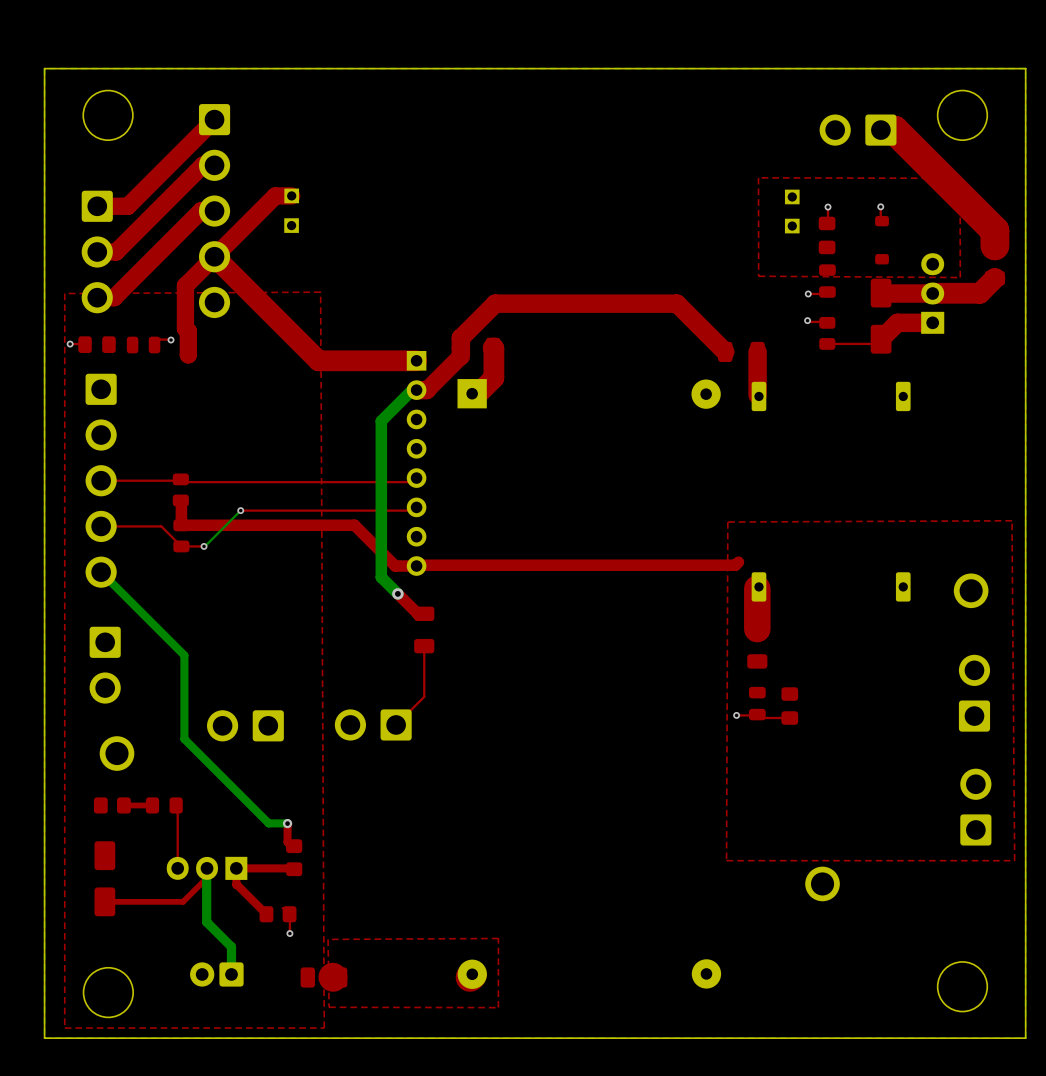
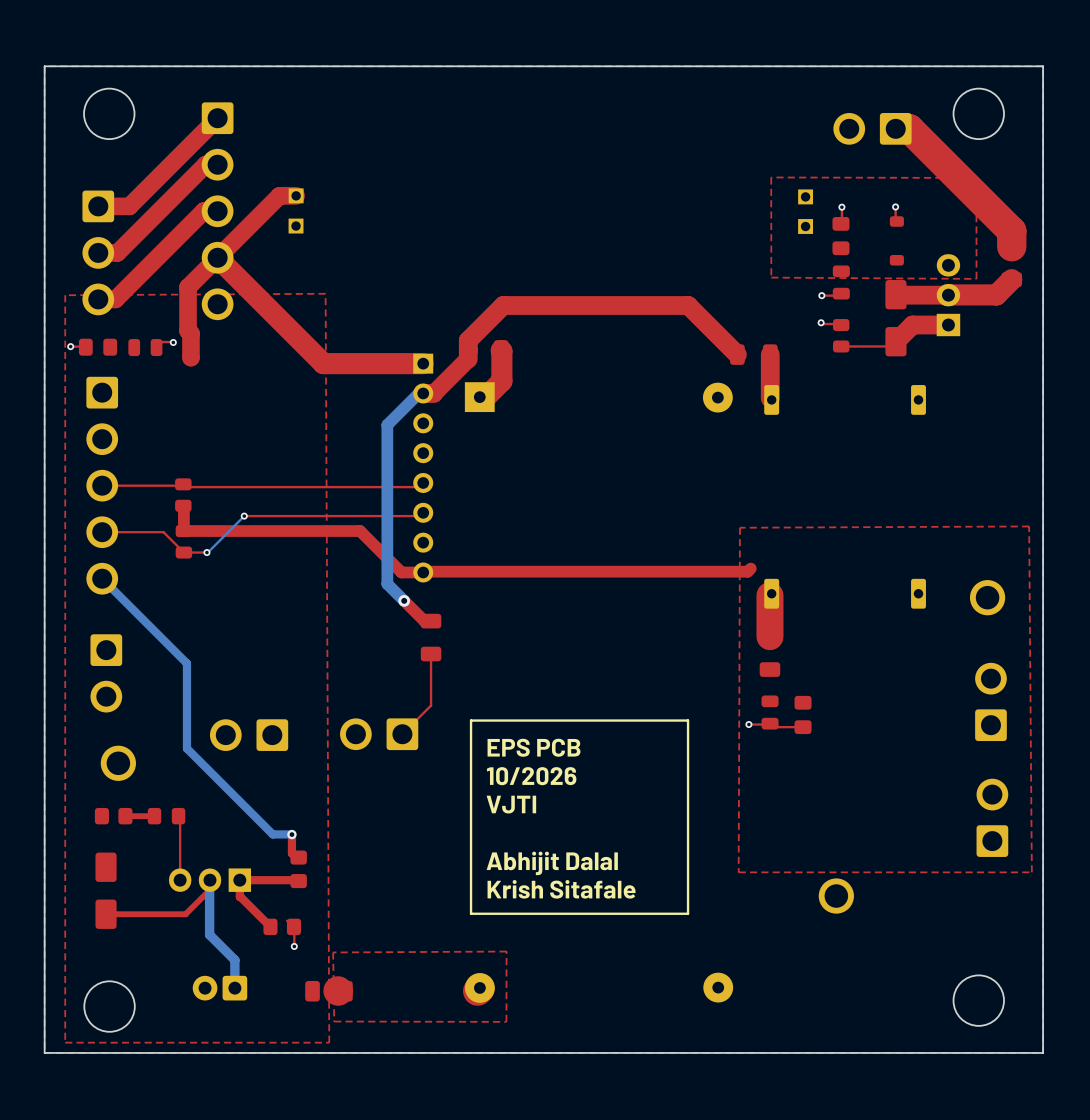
line: none -> (688, 720) (471, 720) (471, 913) (688, 913) (688, 720)
text: none -> EPS PCB (534, 747)
text: none -> 10/2026 (531, 776)
text: none -> VJTI (511, 804)
text: none -> Abhijit Dalal (552, 863)
text: none -> Krish Sitafale (561, 889)

